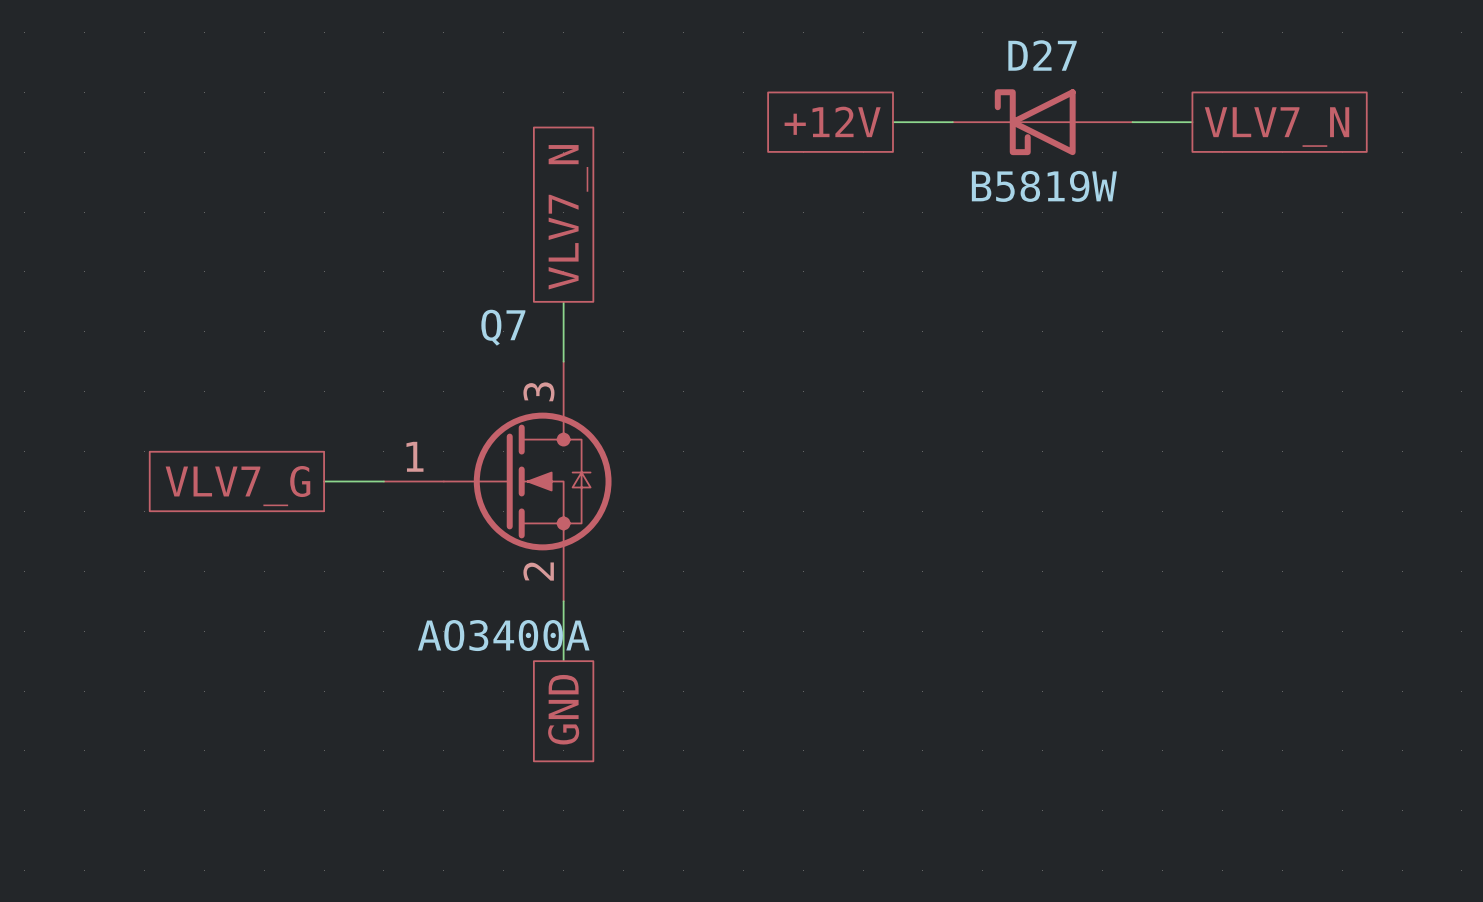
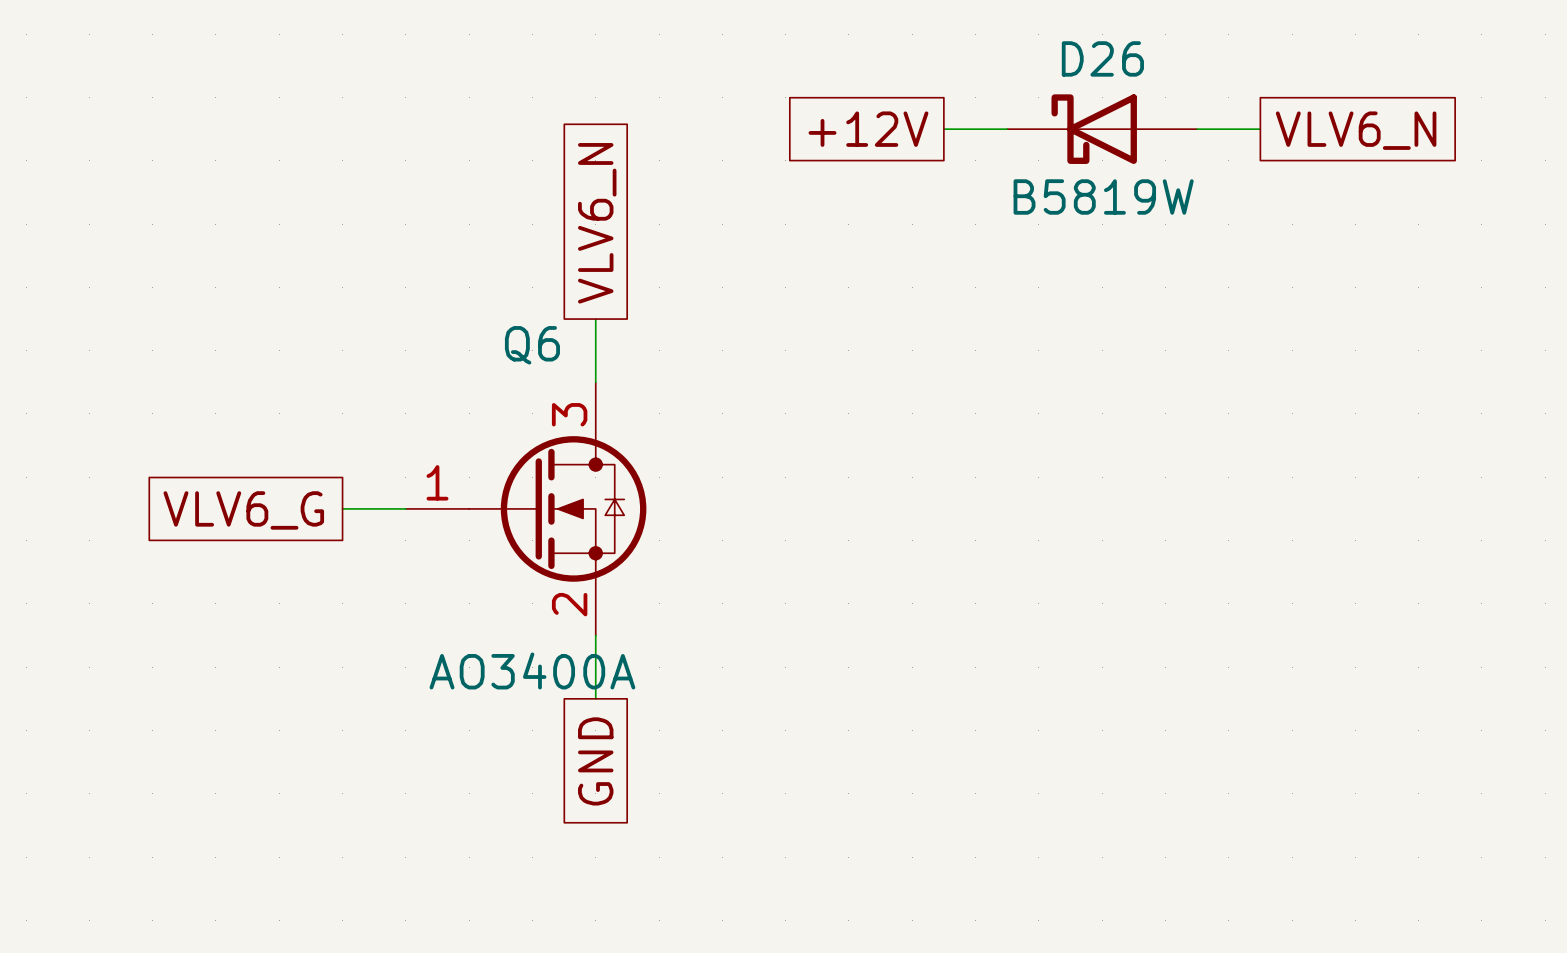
D27 name: D27 (1042, 55) -> D26 (1102, 58)
global label: VLV7_N (1277, 127) -> VLV6_N (1356, 130)
global label: VLV7_N (568, 217) -> VLV6_N (597, 223)
Q7 name: Q7 (503, 327) -> Q6 (532, 345)
global label: VLV7_G (237, 486) -> VLV6_G (243, 510)

